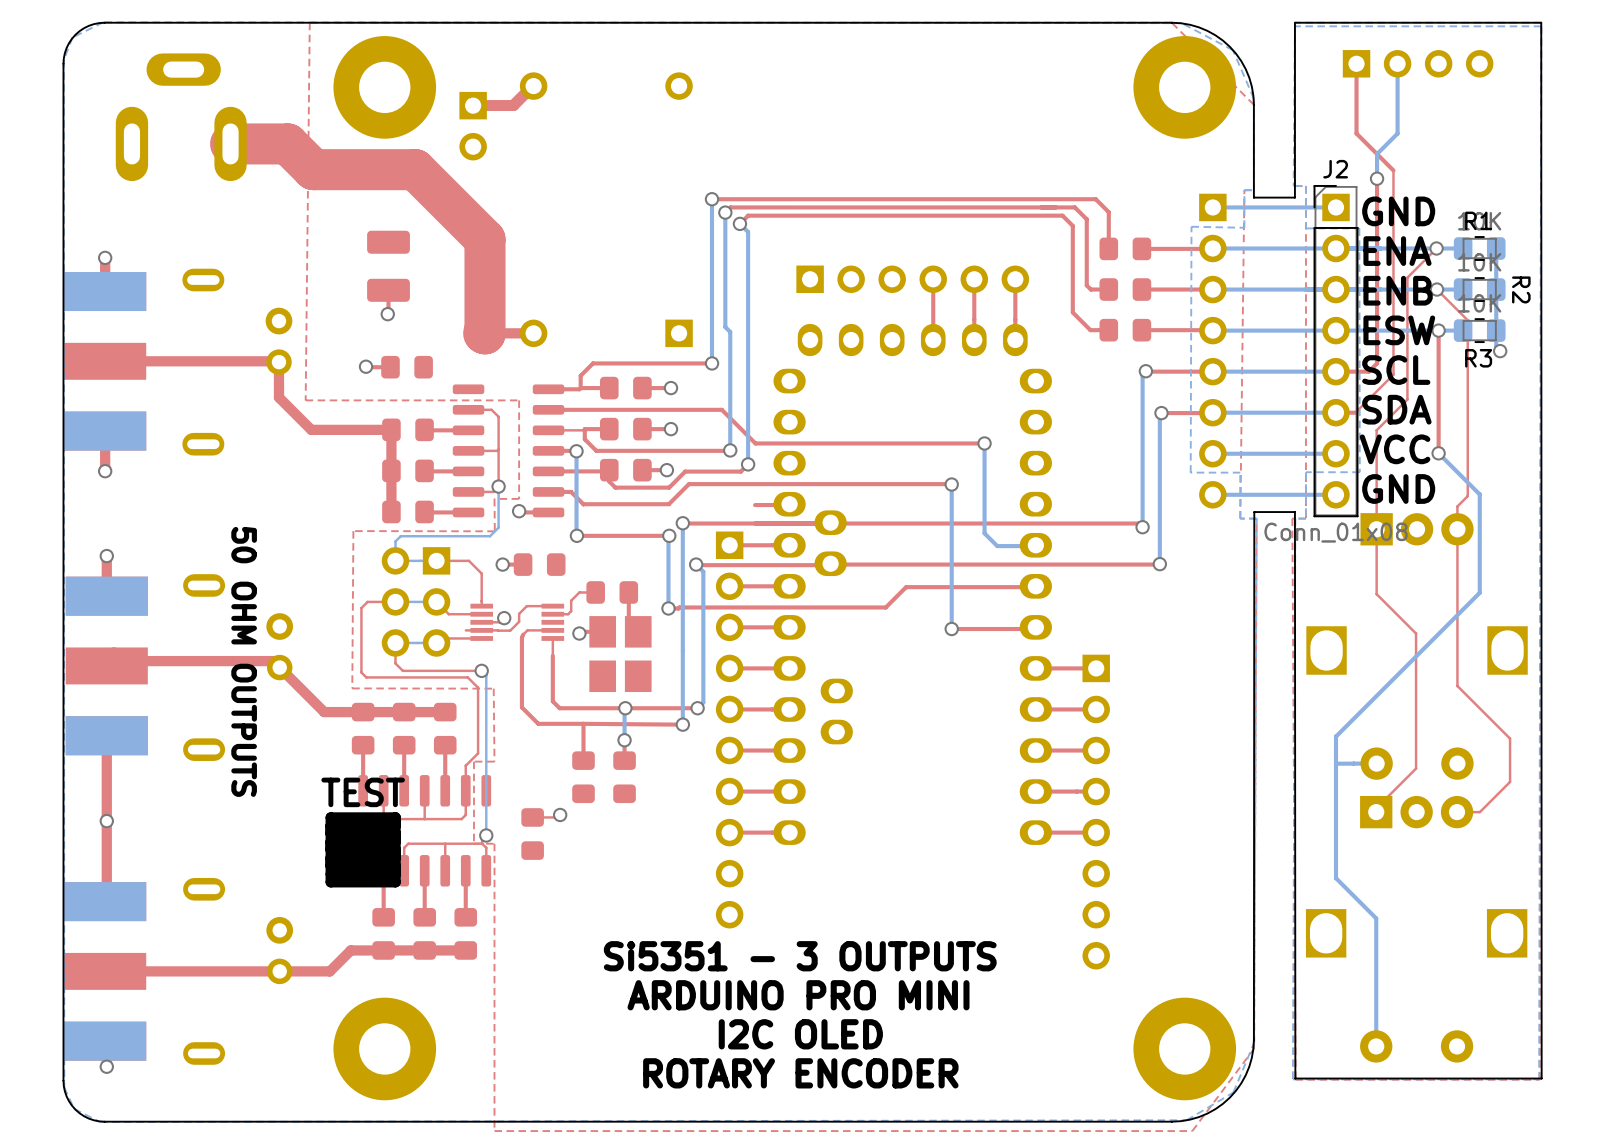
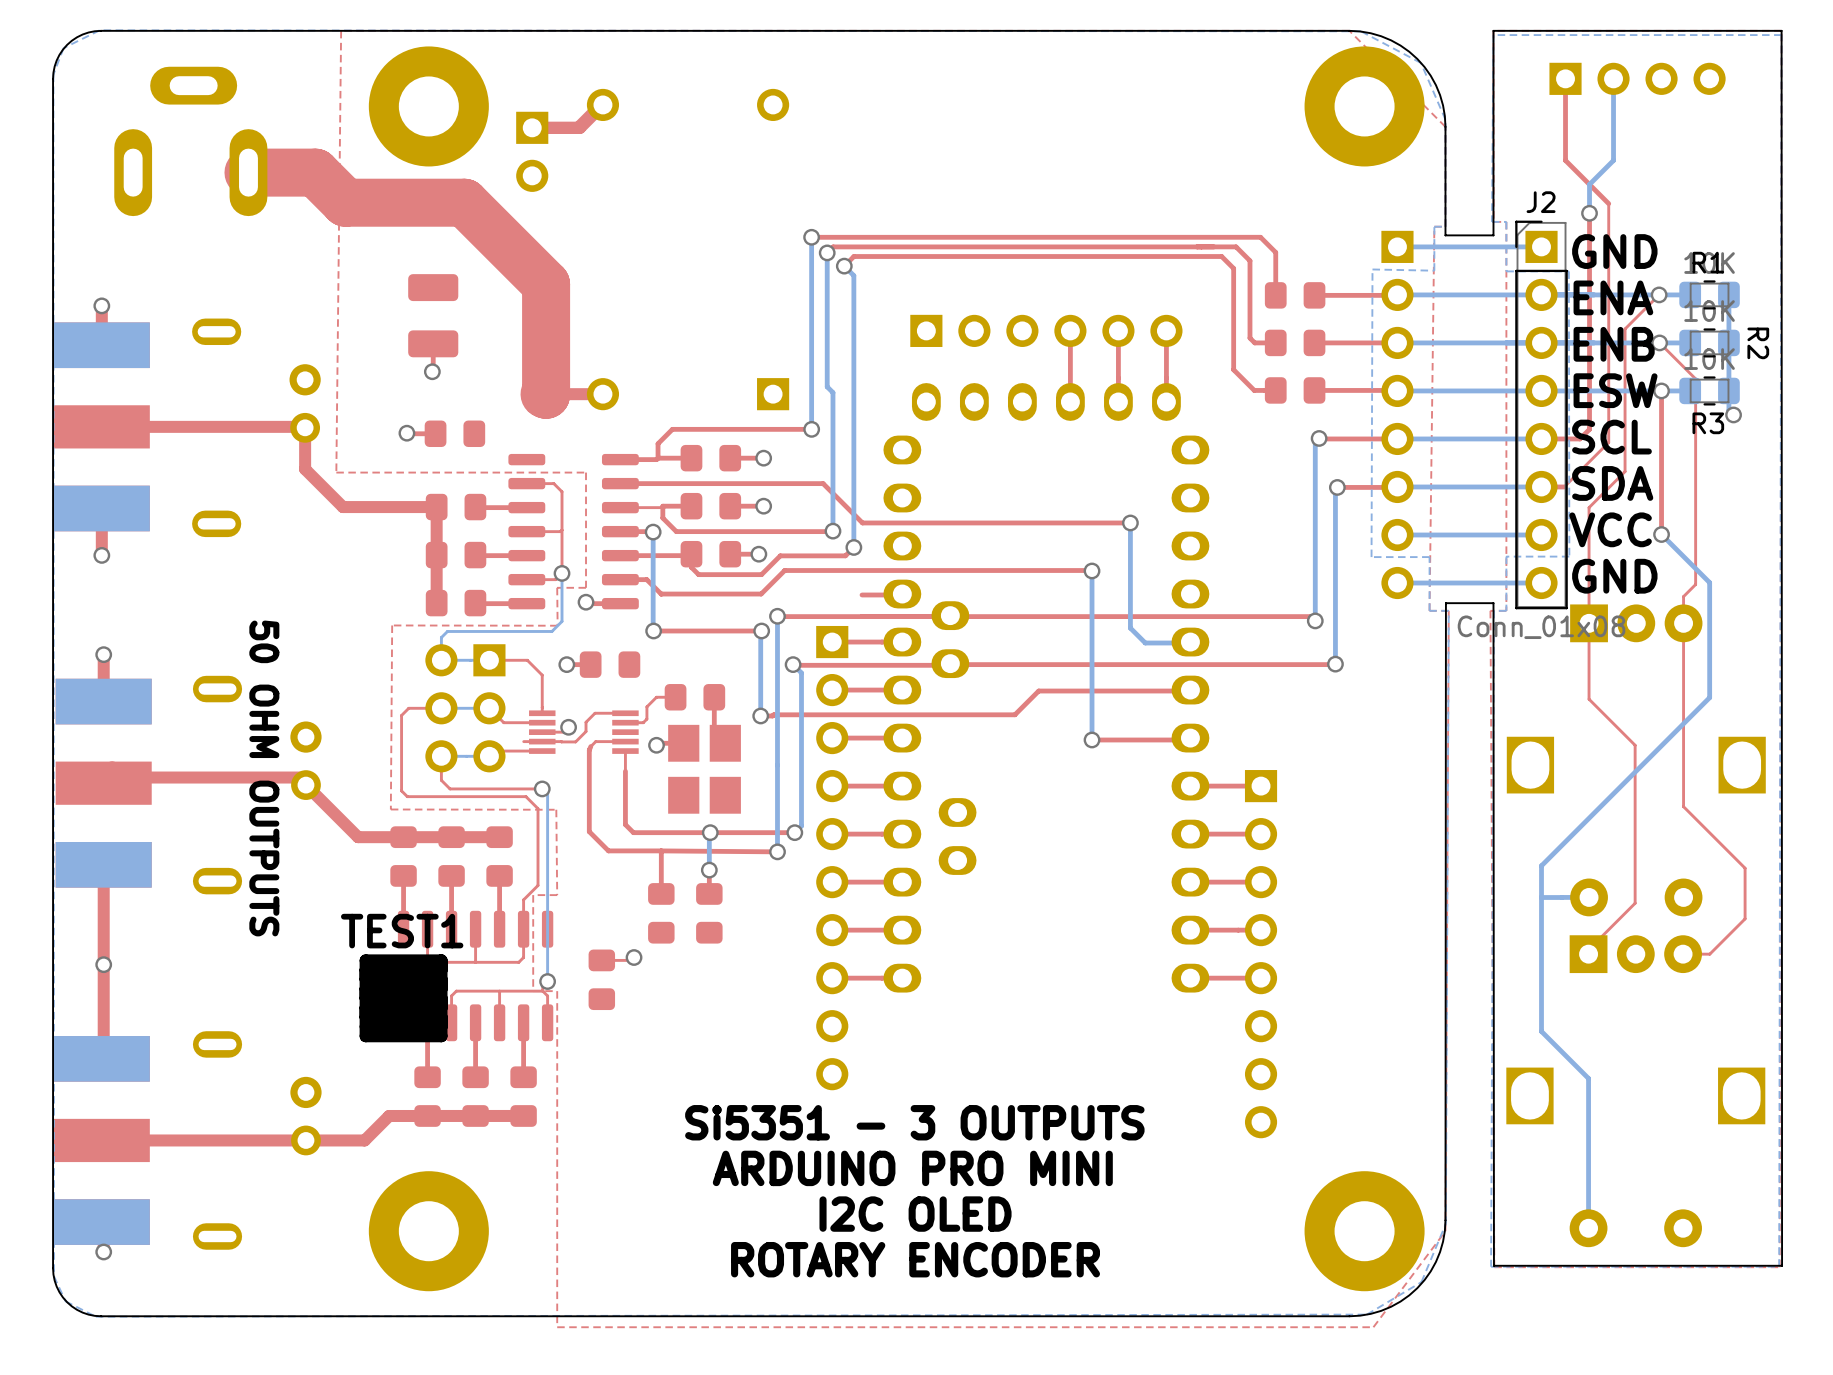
TEST name: TEST (363, 792) -> TEST1 (402, 931)

